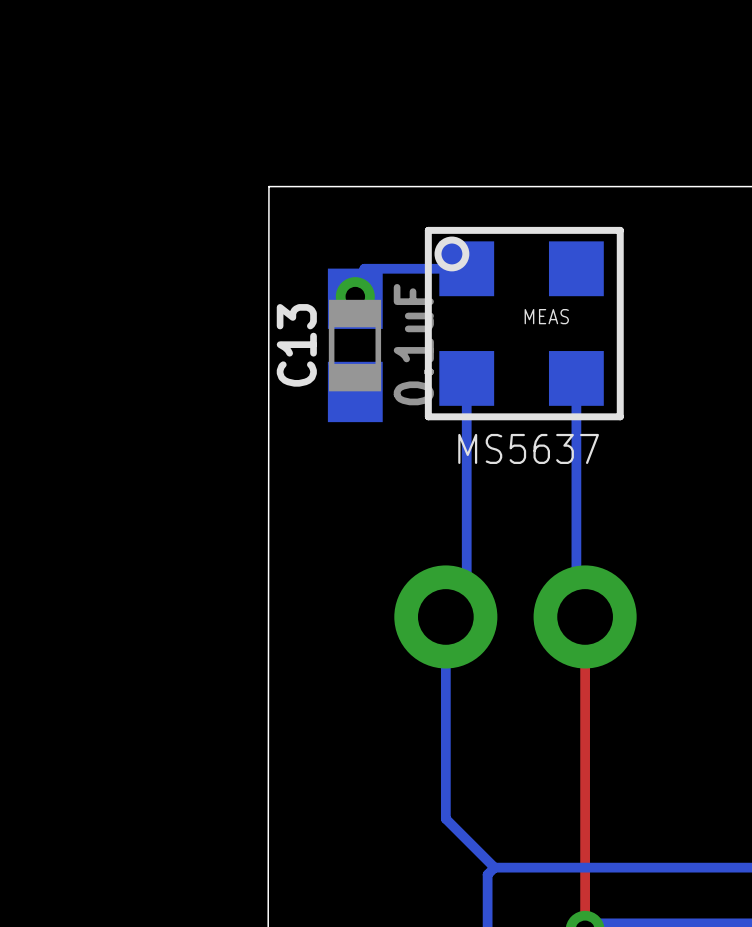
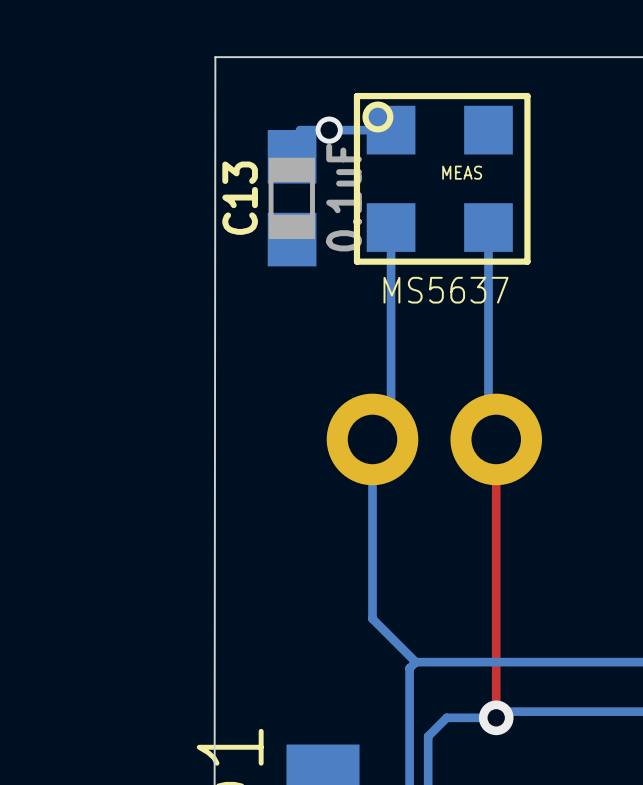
via: none -> (329, 130)
via: (355, 296) -> none

